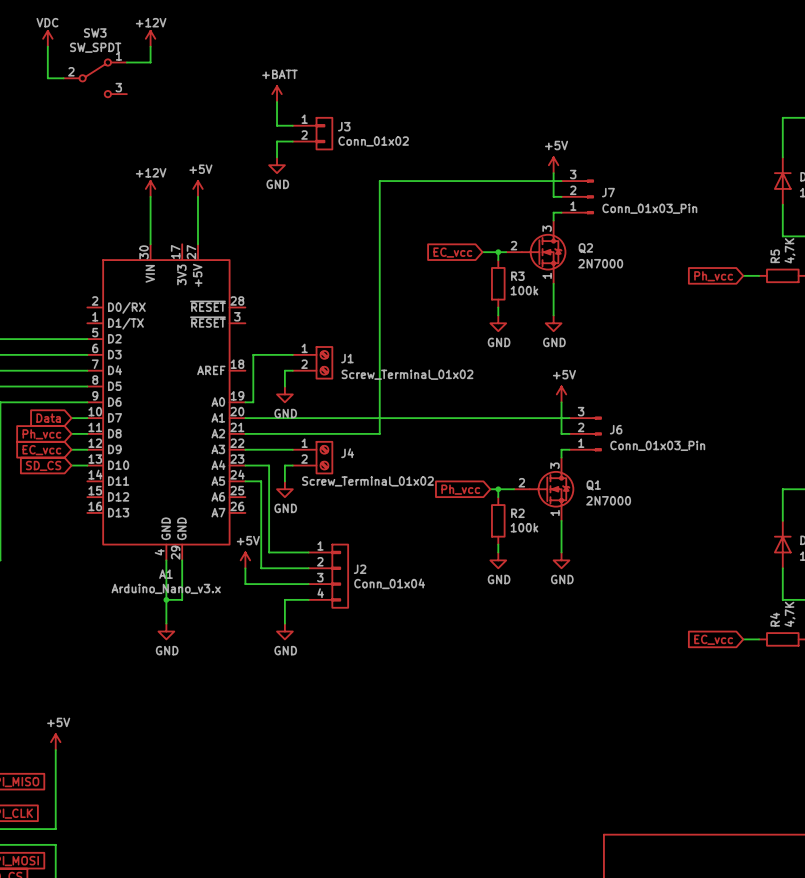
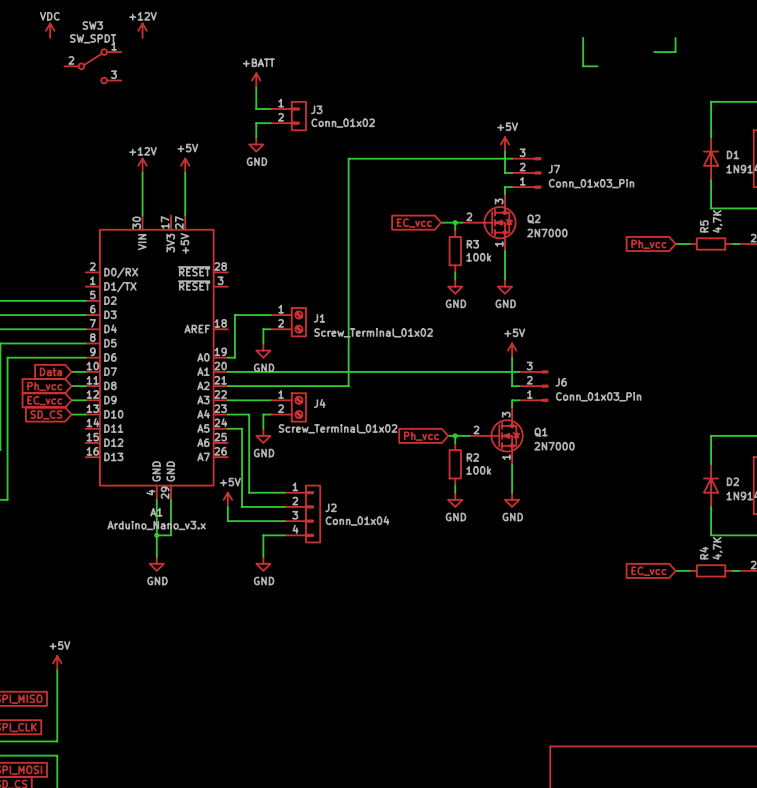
wire: (47, 46) (47, 78) (63, 78) -> none
wire: (150, 46) (150, 62) (126, 62) -> none
wire: none -> (583, 37) (583, 66) (597, 66)
wire: none -> (675, 37) (675, 52) (654, 52)

